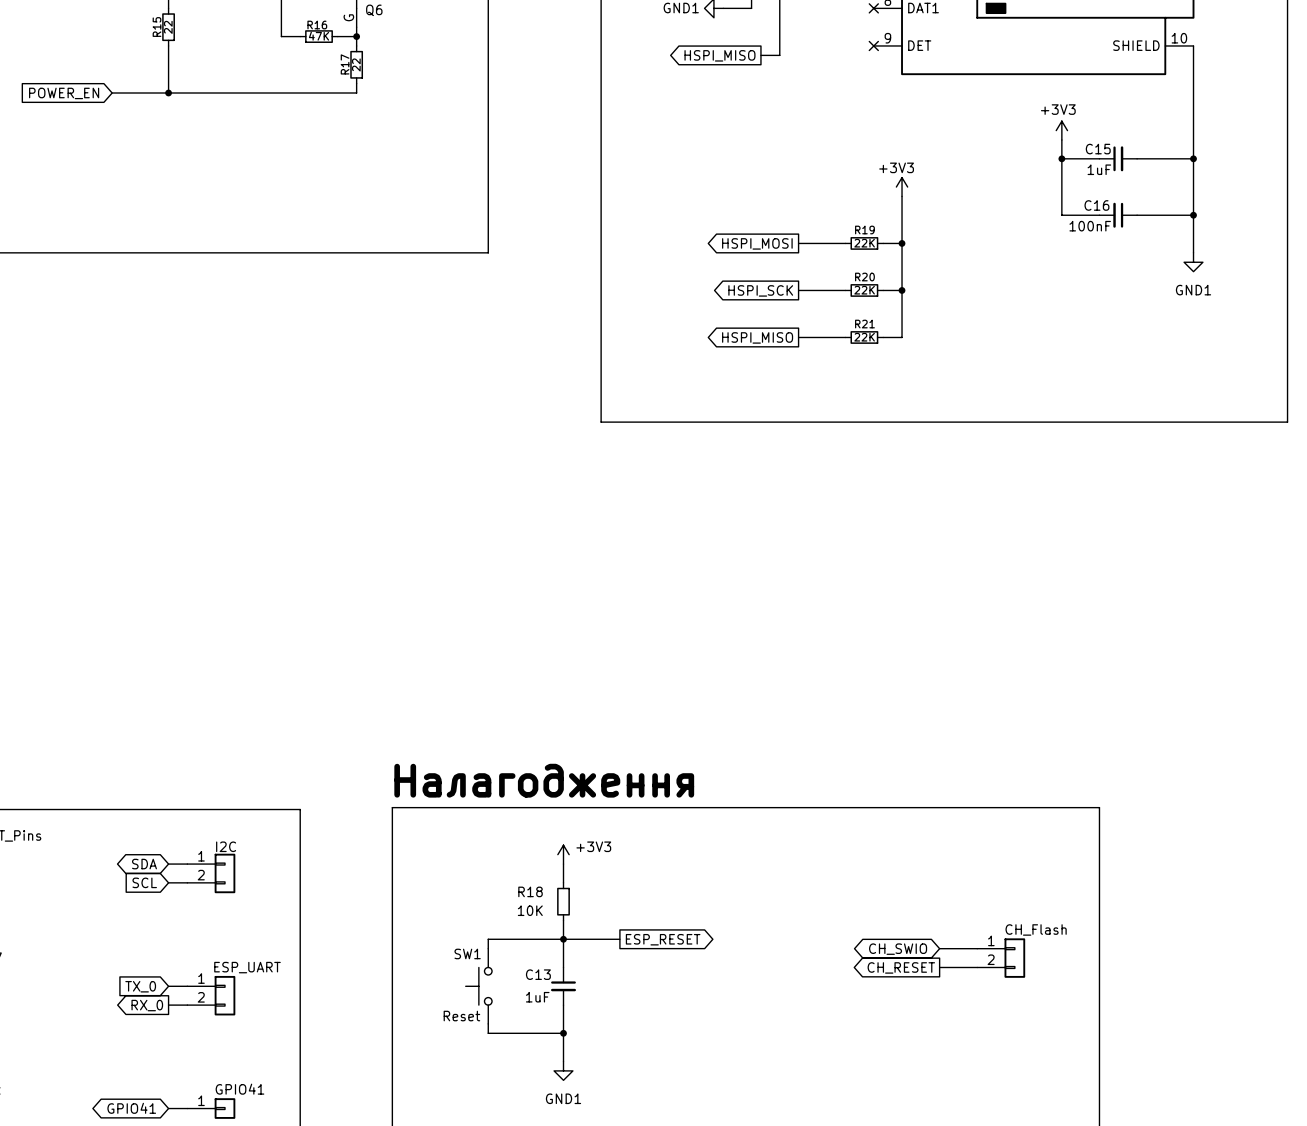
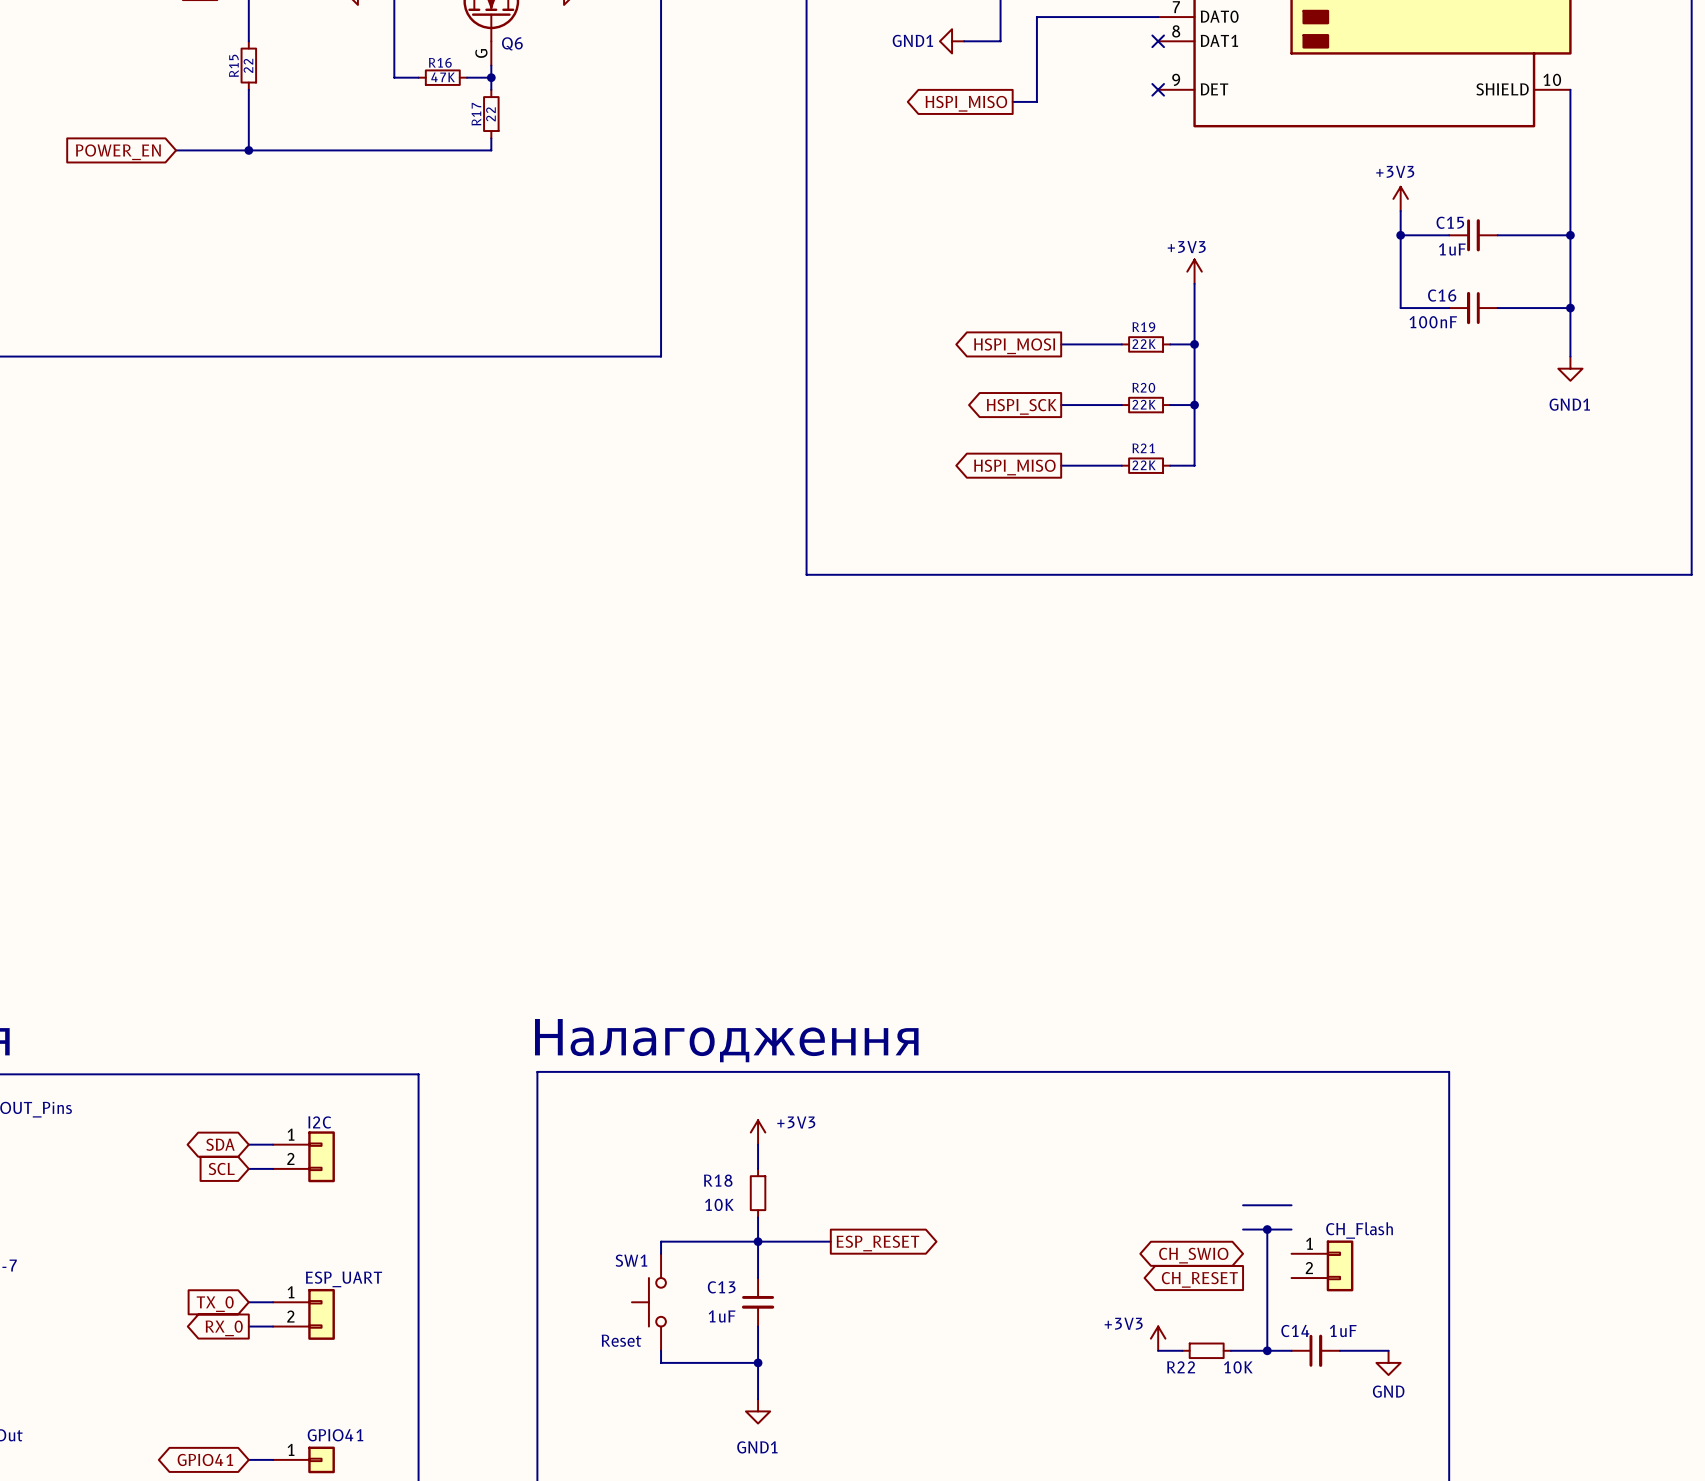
wire: none -> (1267, 1229) (1267, 1350)
junction: none -> (1267, 1229)
wire: (939, 948) (977, 948) -> (1243, 1205) (1291, 1205)
wire: (939, 967) (977, 967) -> (1243, 1229) (1291, 1229)
power symbol: none -> +3V3 (1158, 1338)
wire: none -> (1158, 1350) (1182, 1350)
R22: none -> 10K (1206, 1350)
wire: none -> (1230, 1350) (1291, 1350)
junction: none -> (1267, 1350)
C14: none -> 1uF (1315, 1350)
wire: none -> (1340, 1350) (1388, 1350)
power symbol: none -> GND (1388, 1362)

